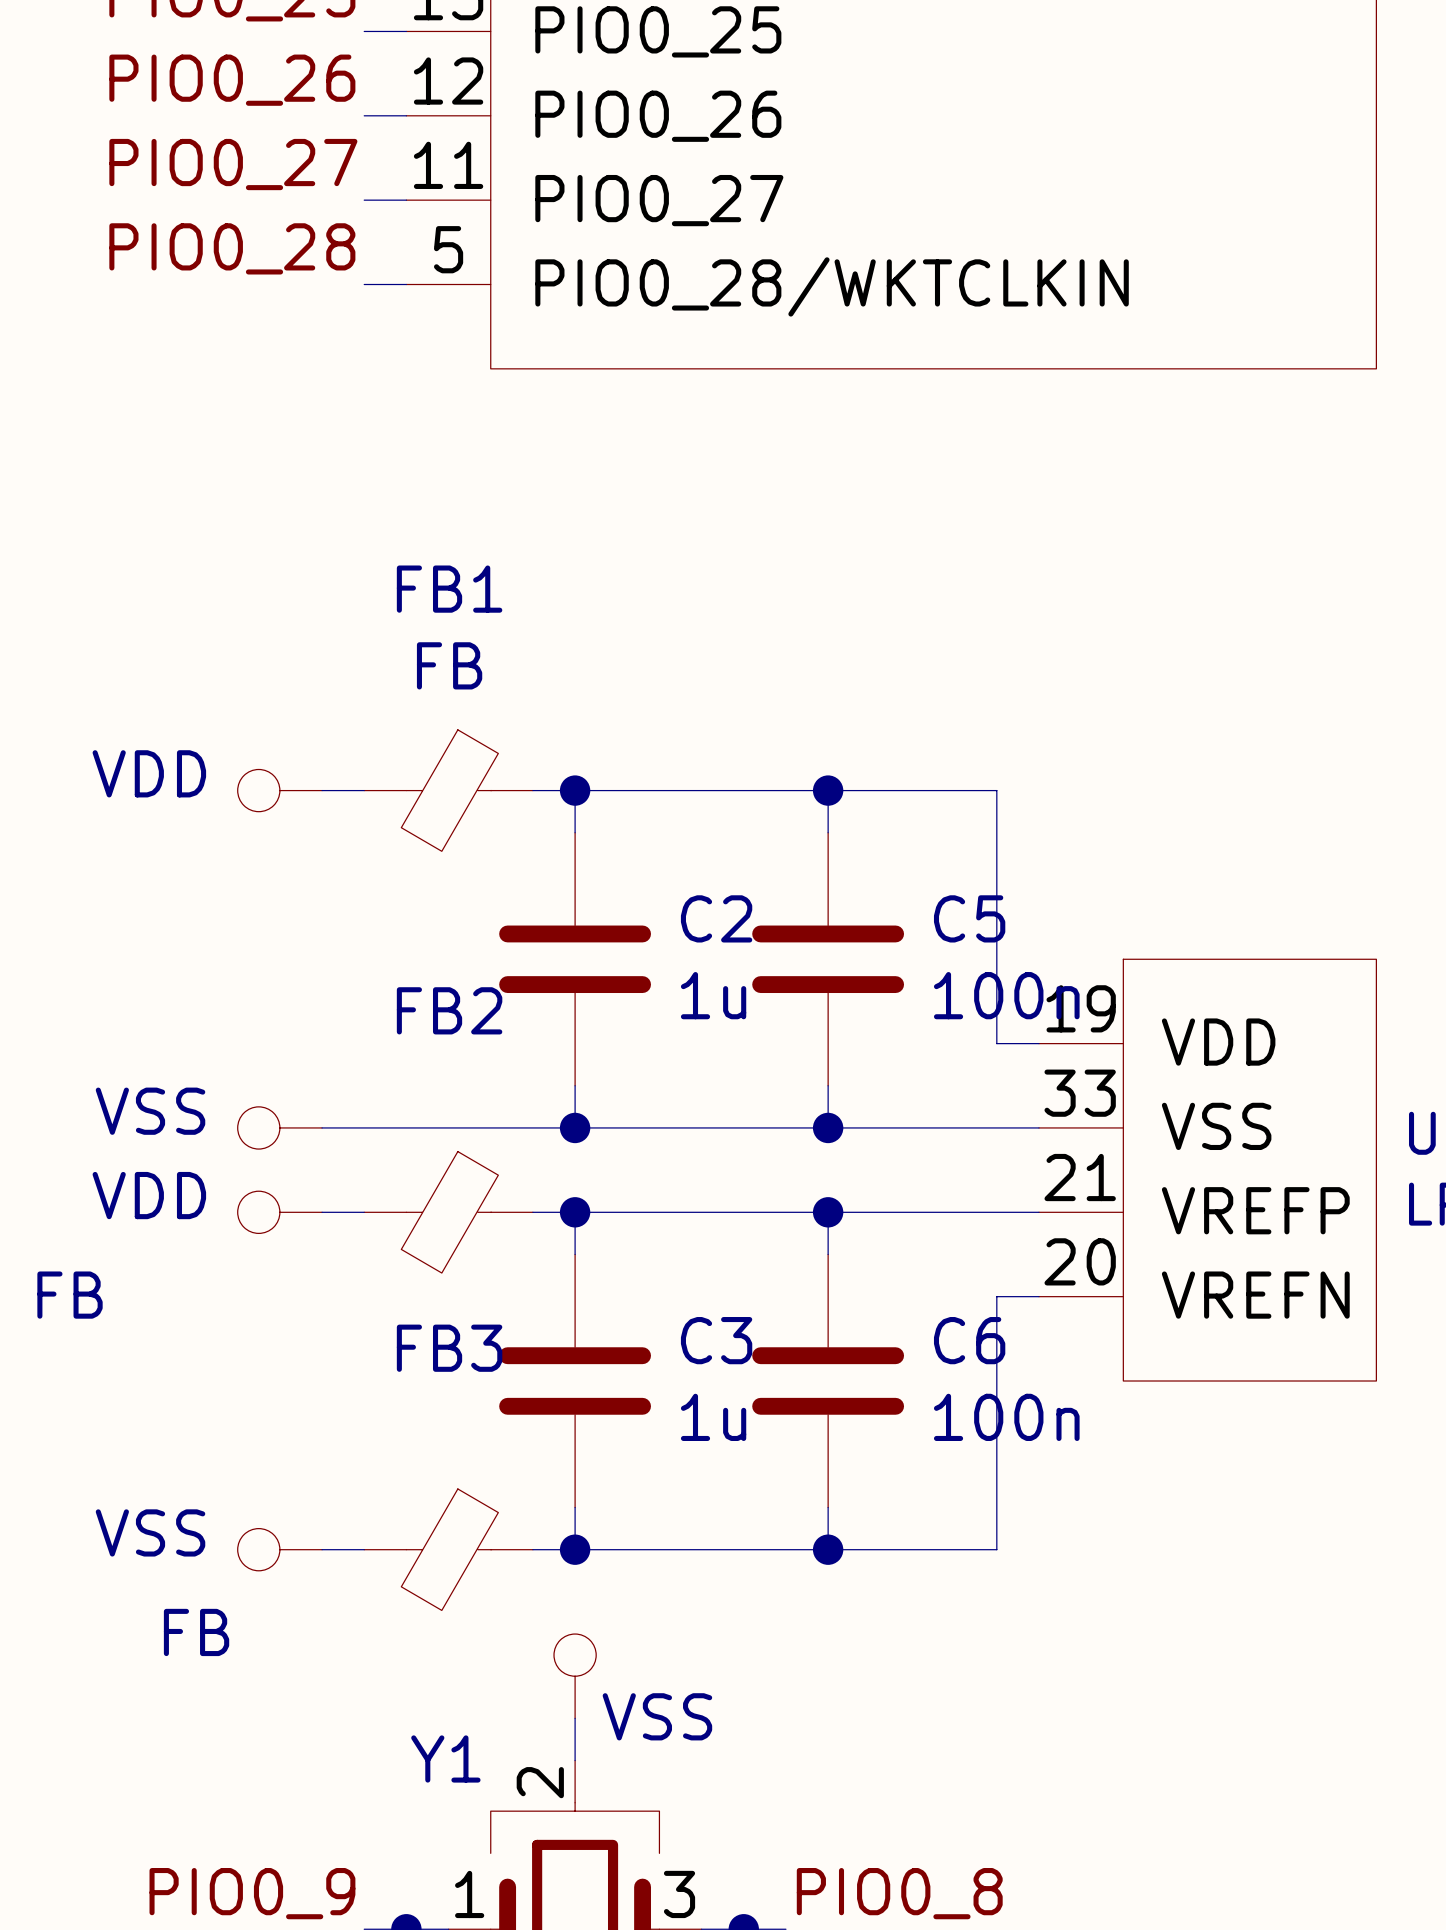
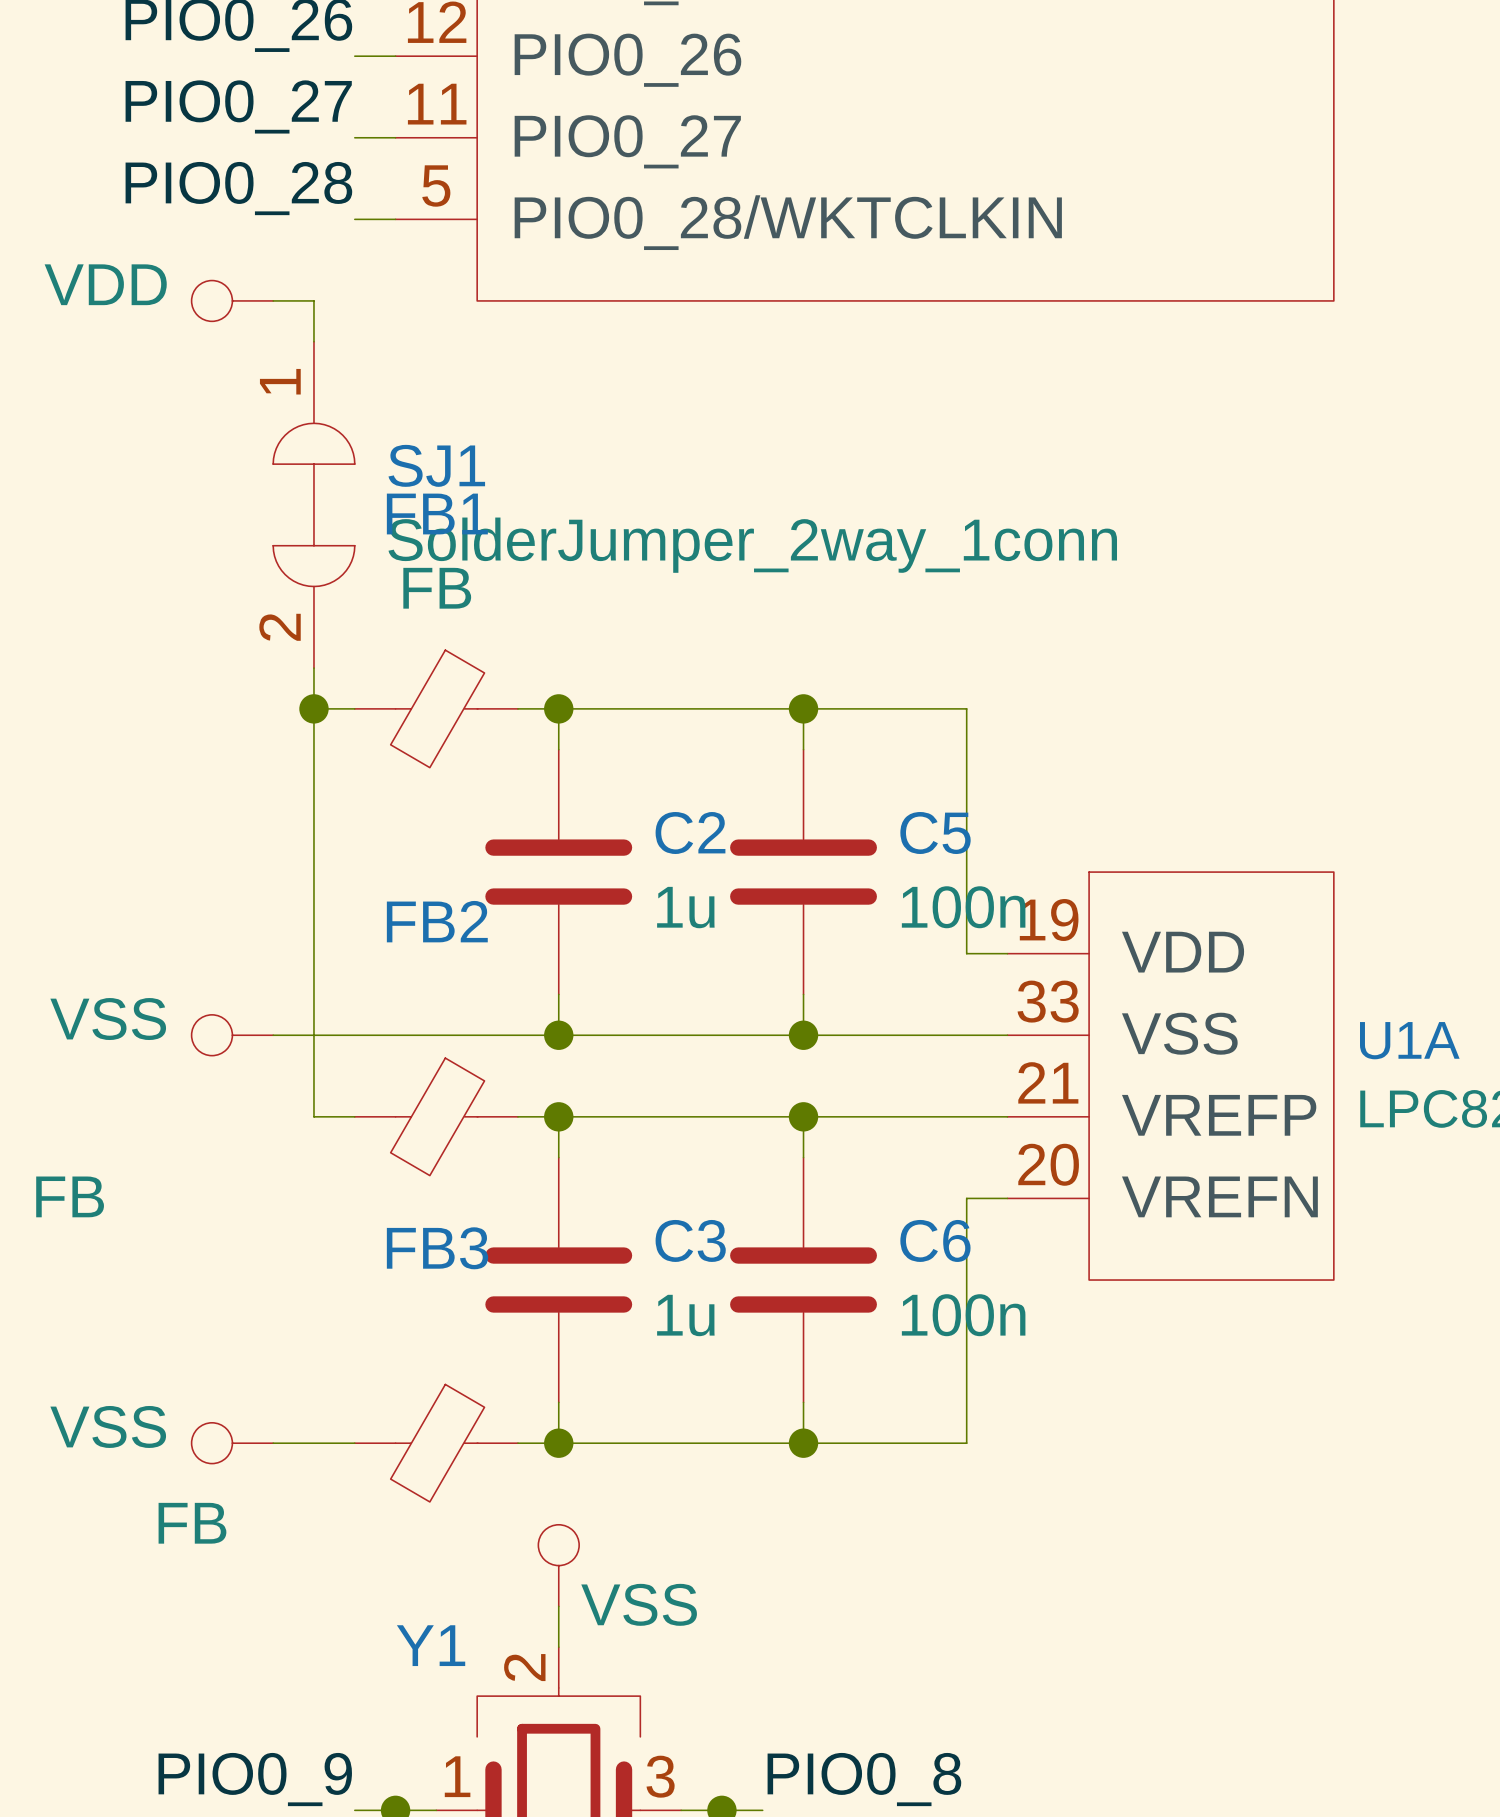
power symbol: none -> VDD (232, 300)
wire: none -> (273, 300) (313, 300) (313, 341)
SJ1: none -> SolderJumper_2way_1conn (313, 504)
wire: none -> (313, 668) (313, 1116)
power symbol: VDD (279, 790) -> none
junction: none -> (313, 708)
power symbol position: VSS (279, 1127) -> VSS (232, 1035)
power symbol: VDD (279, 1212) -> none
power symbol position: VSS (279, 1549) -> VSS (232, 1443)

